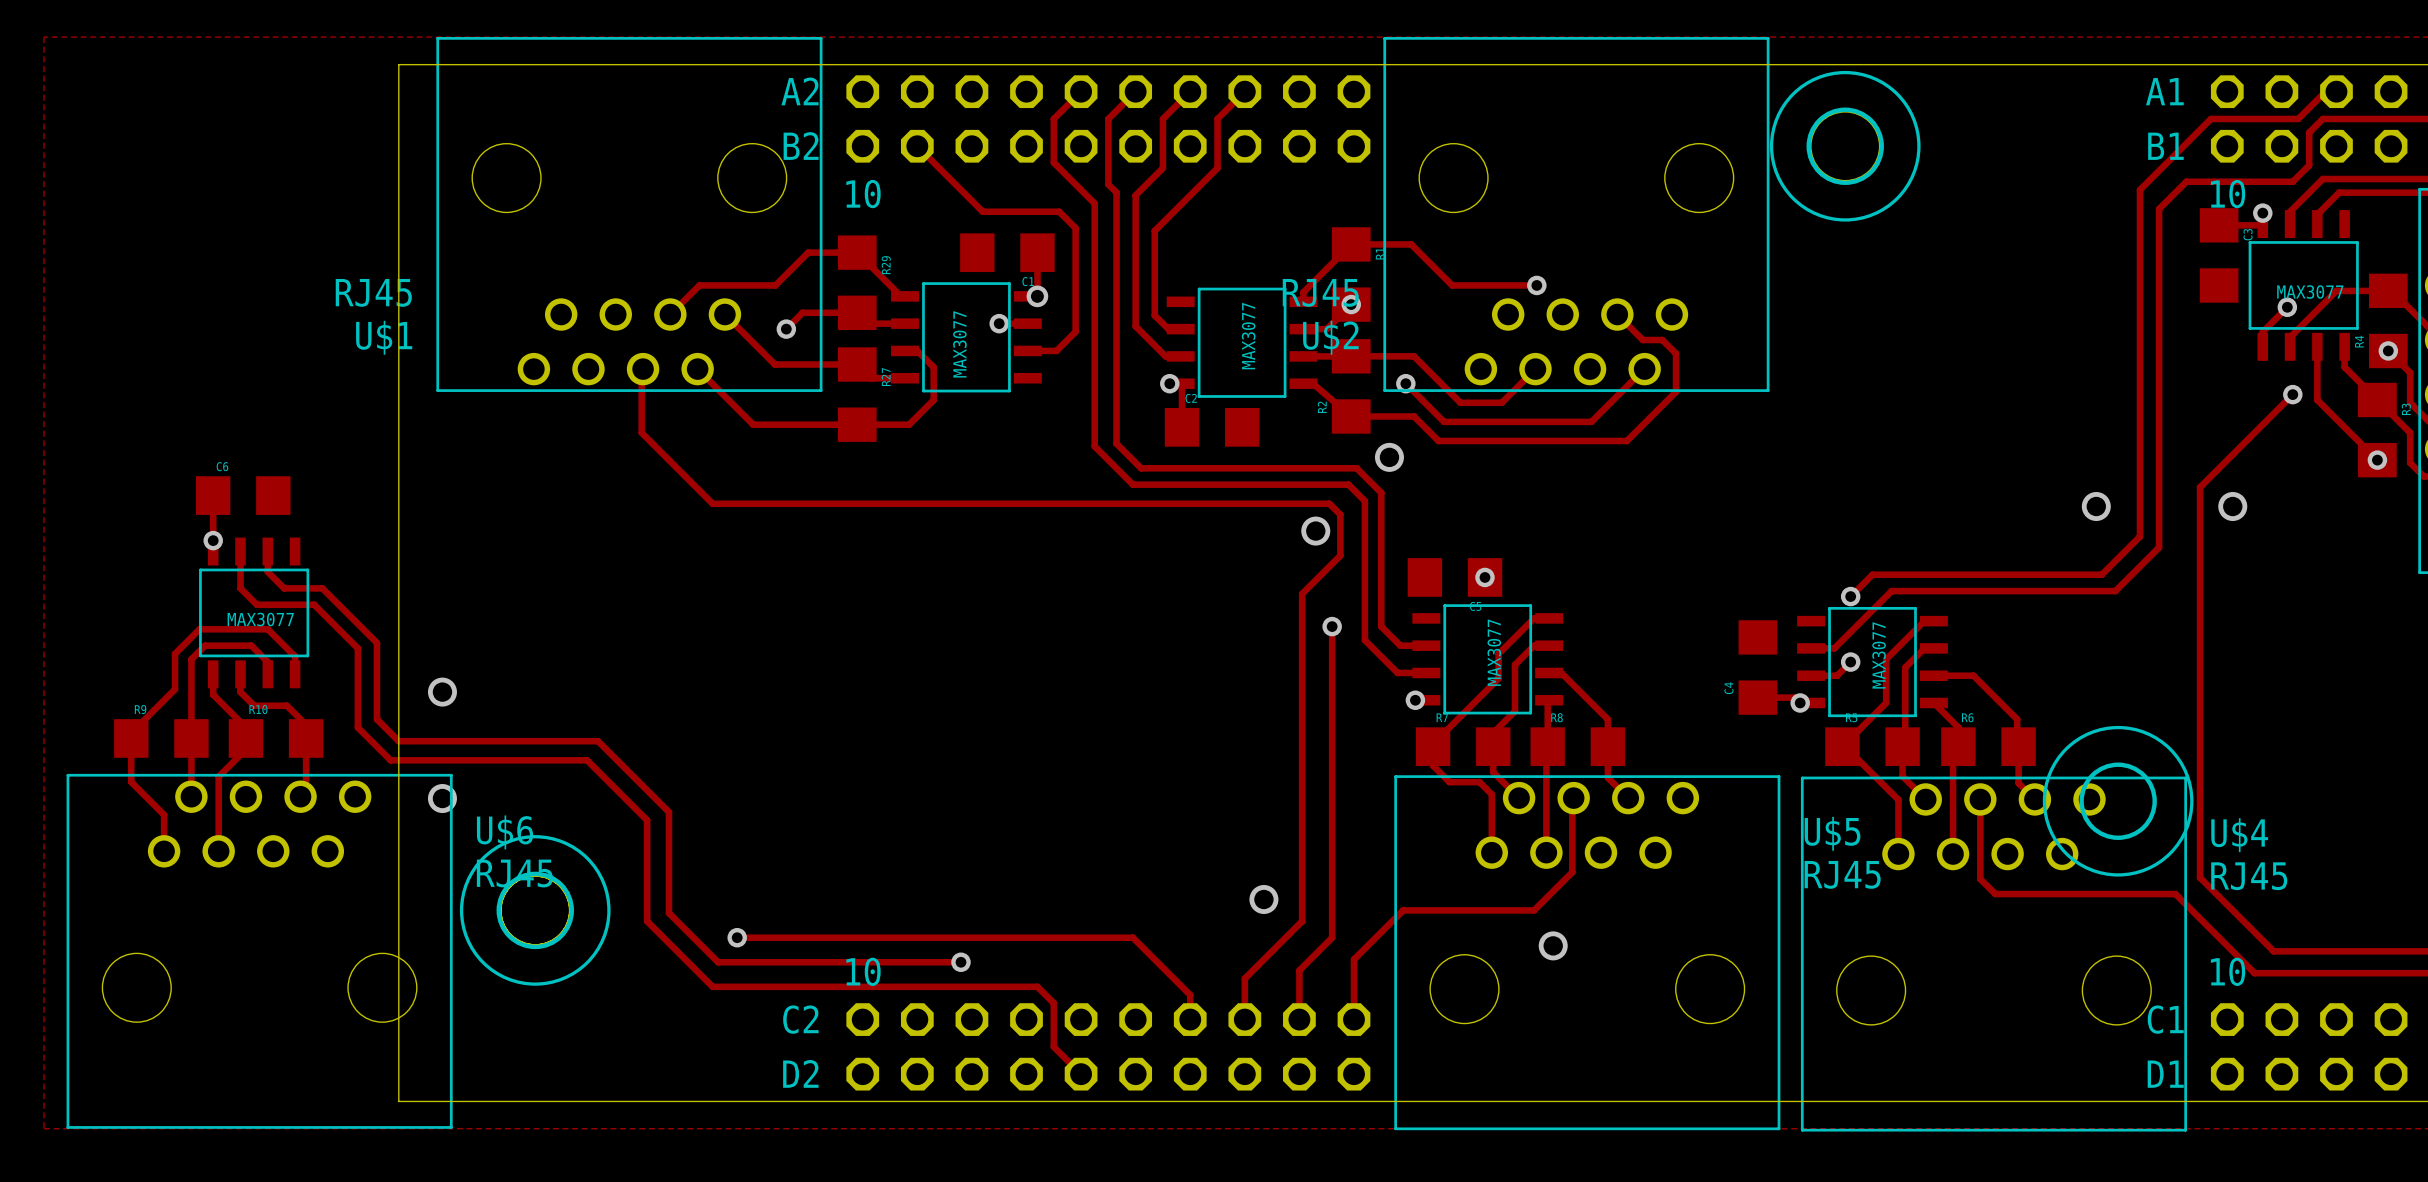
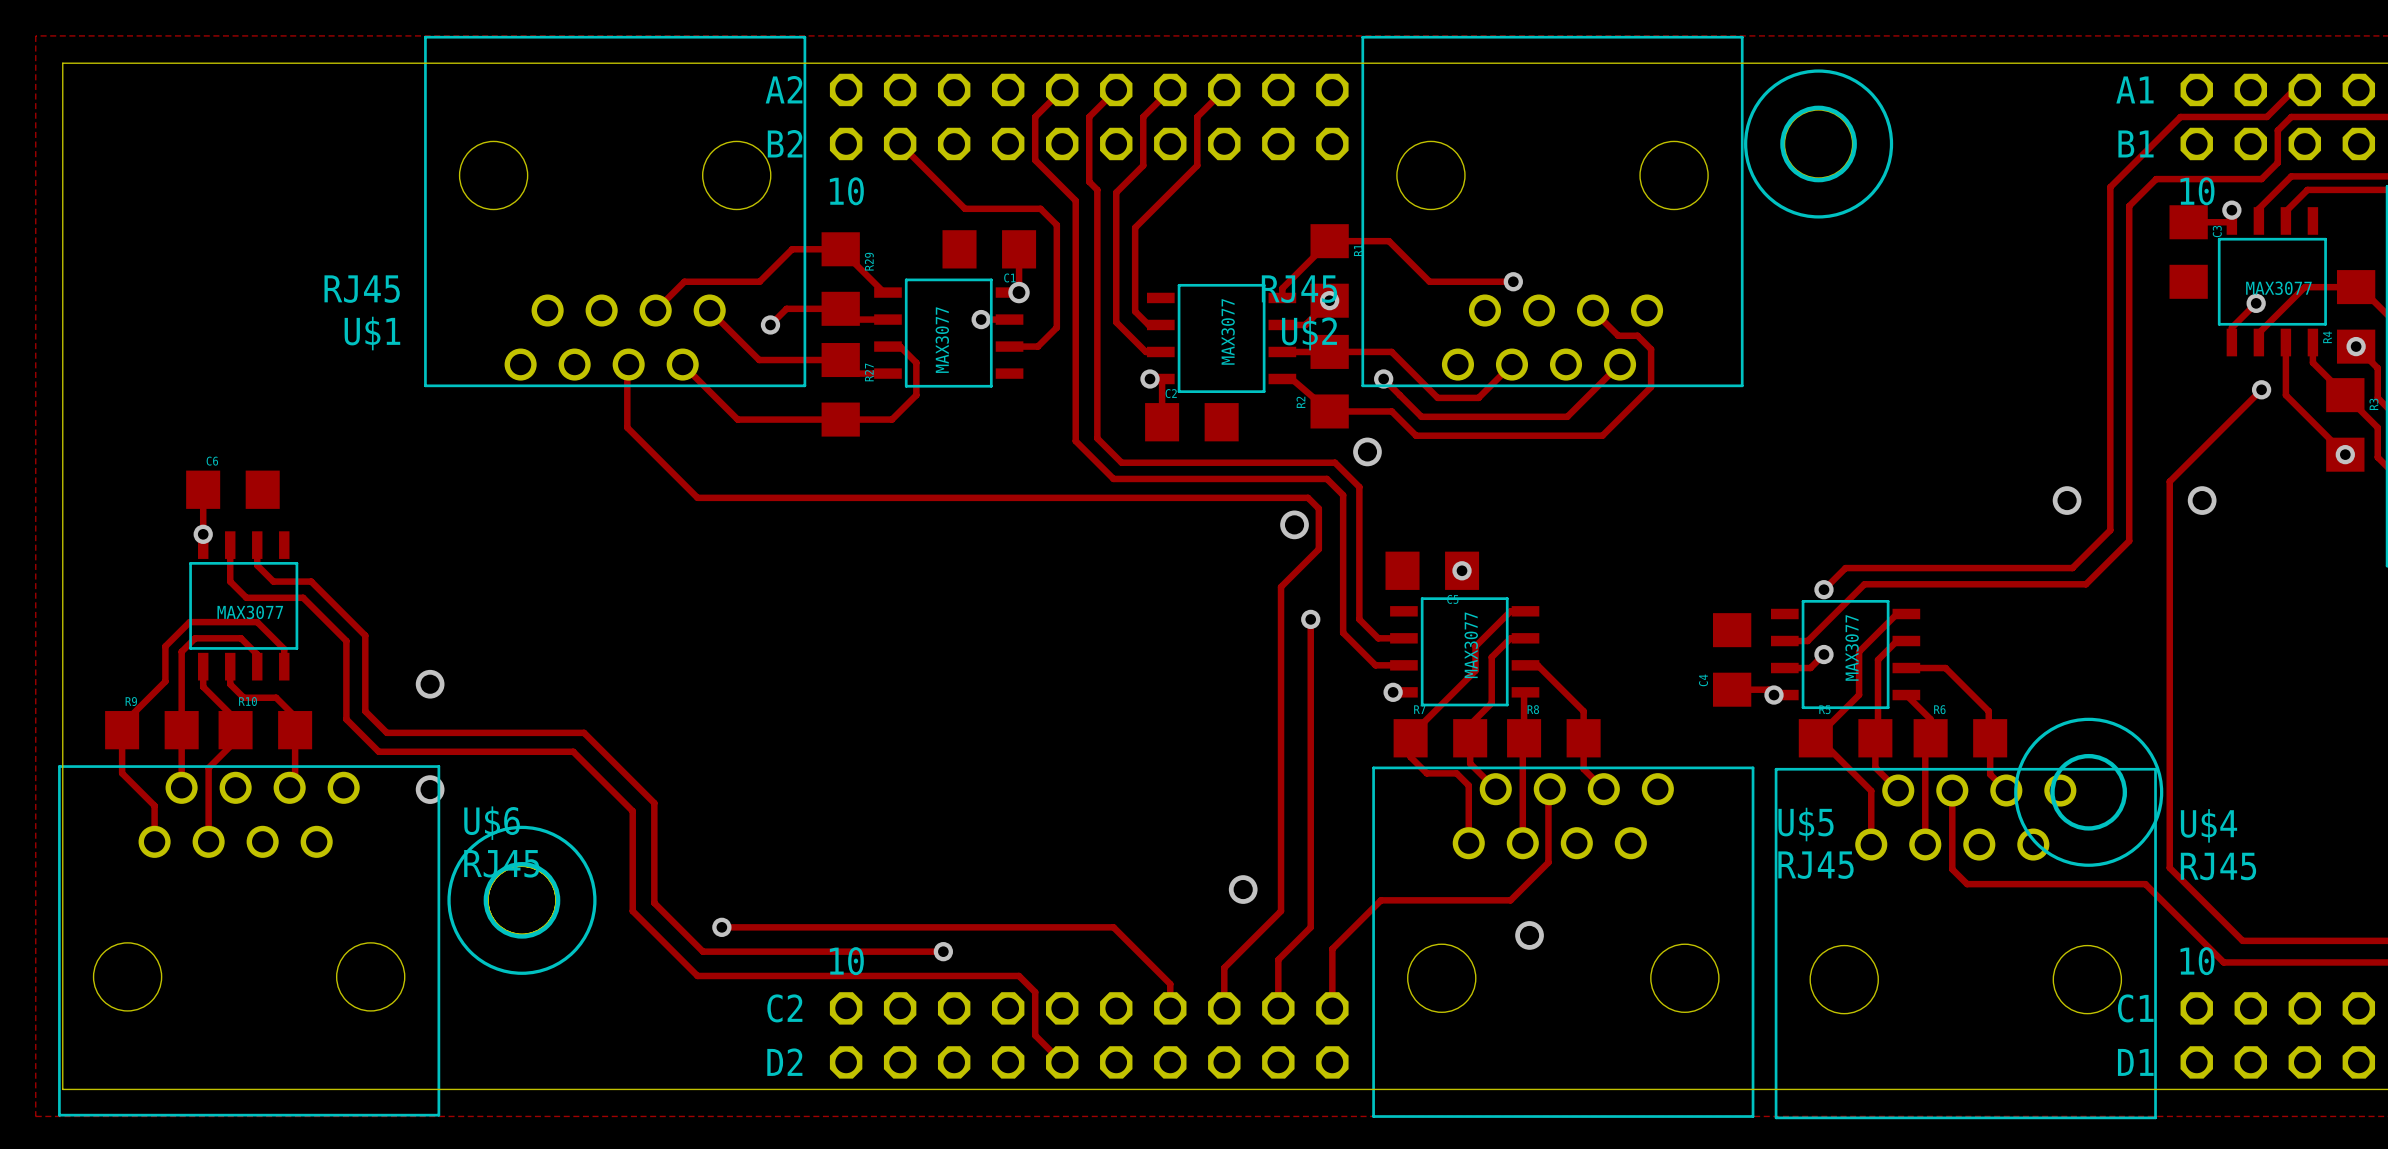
board edge: (398, 64) (398, 1101) -> (386, 63) (62, 63) (62, 1089) (386, 1089)

